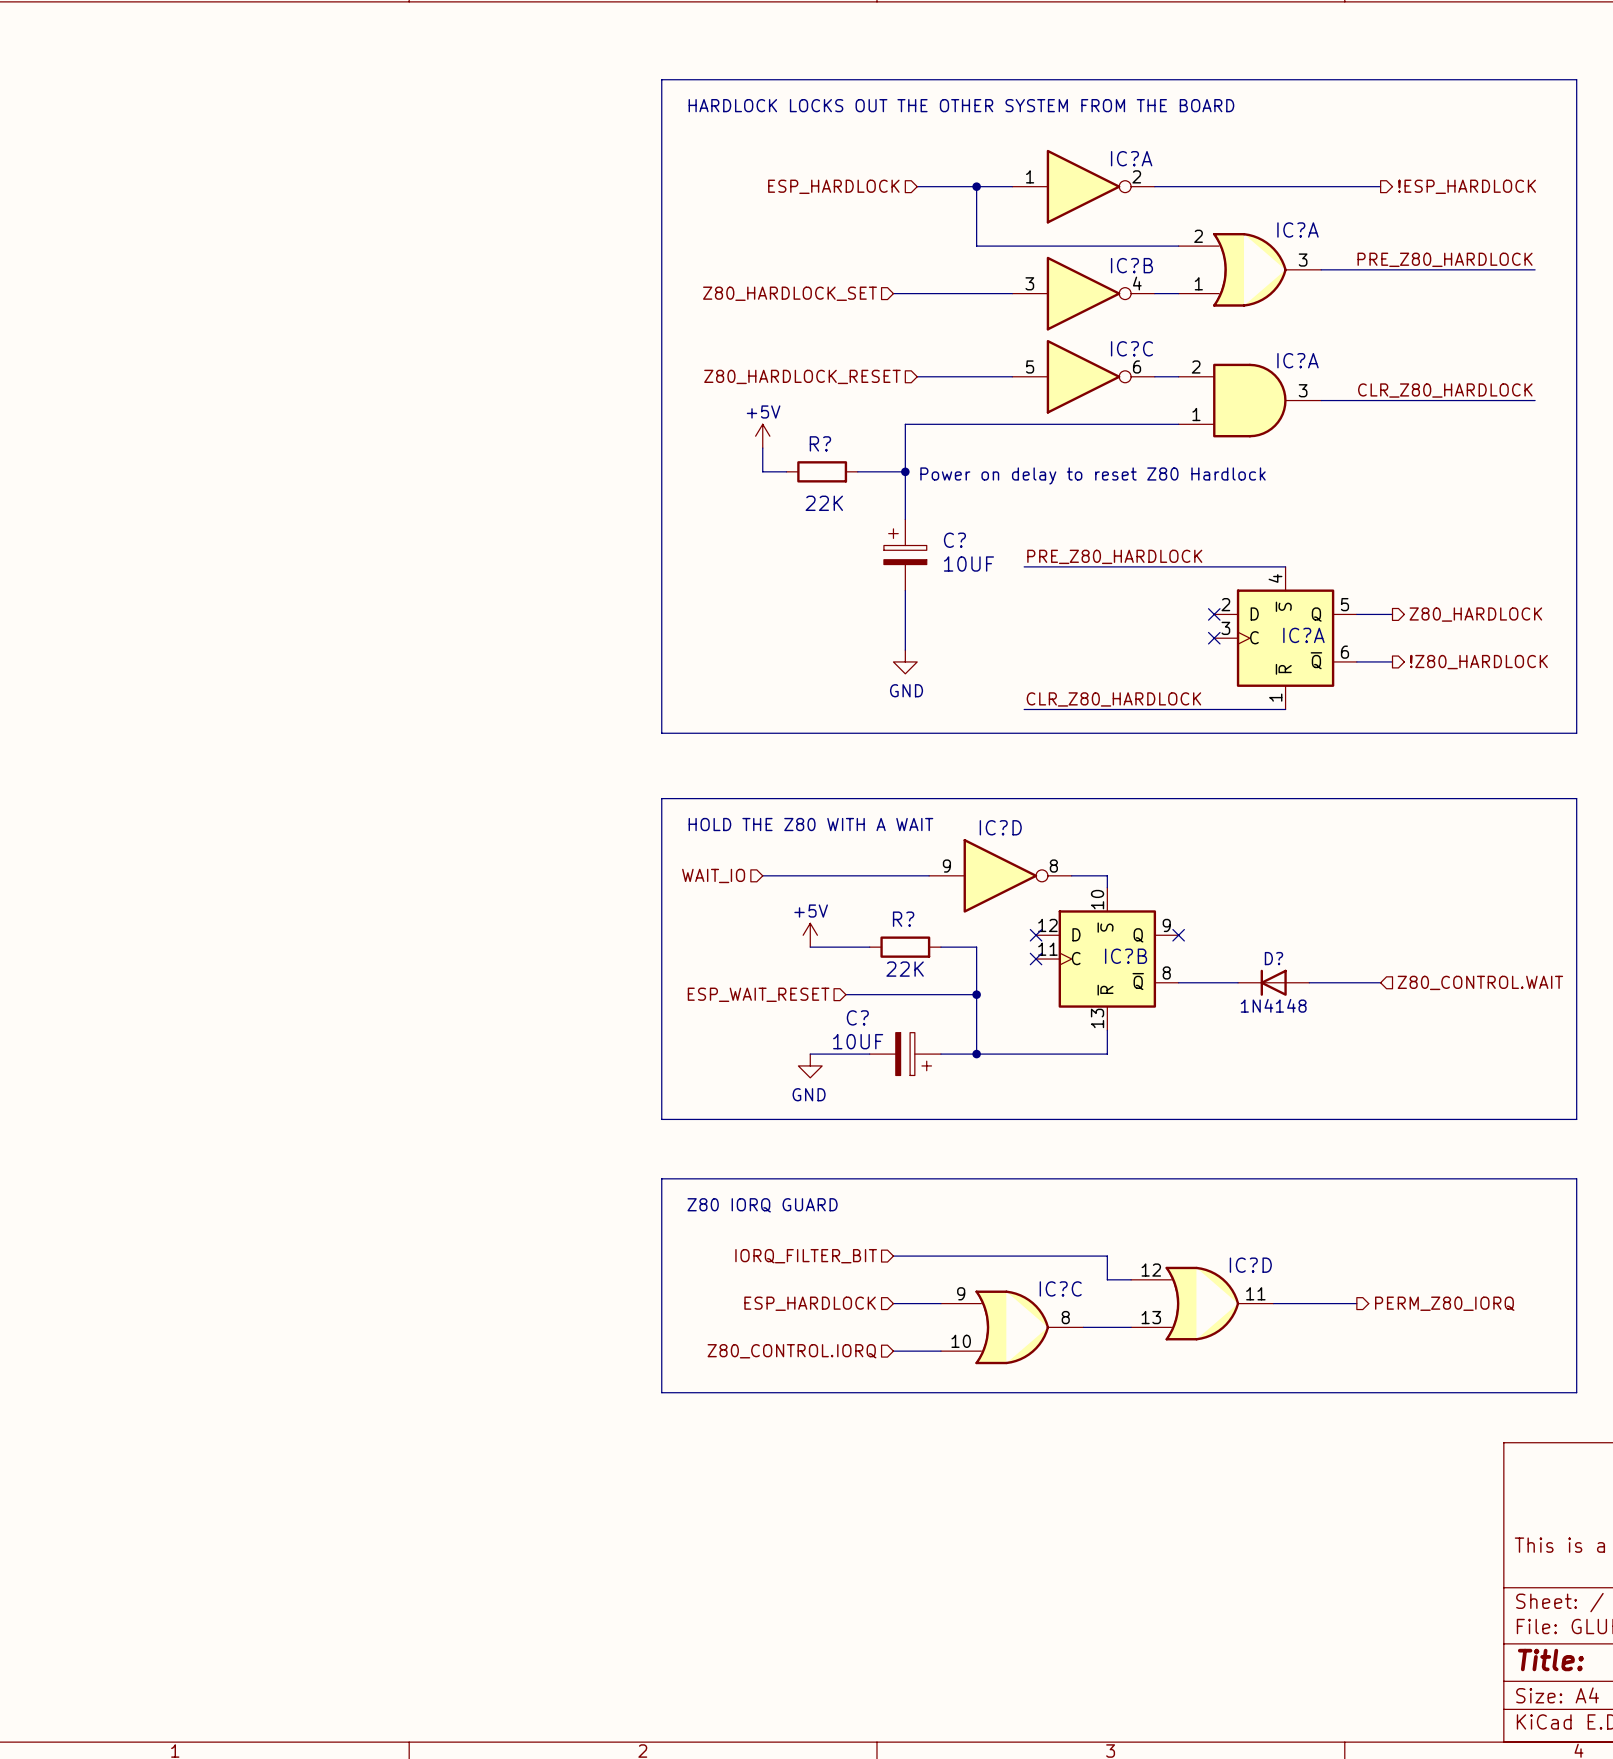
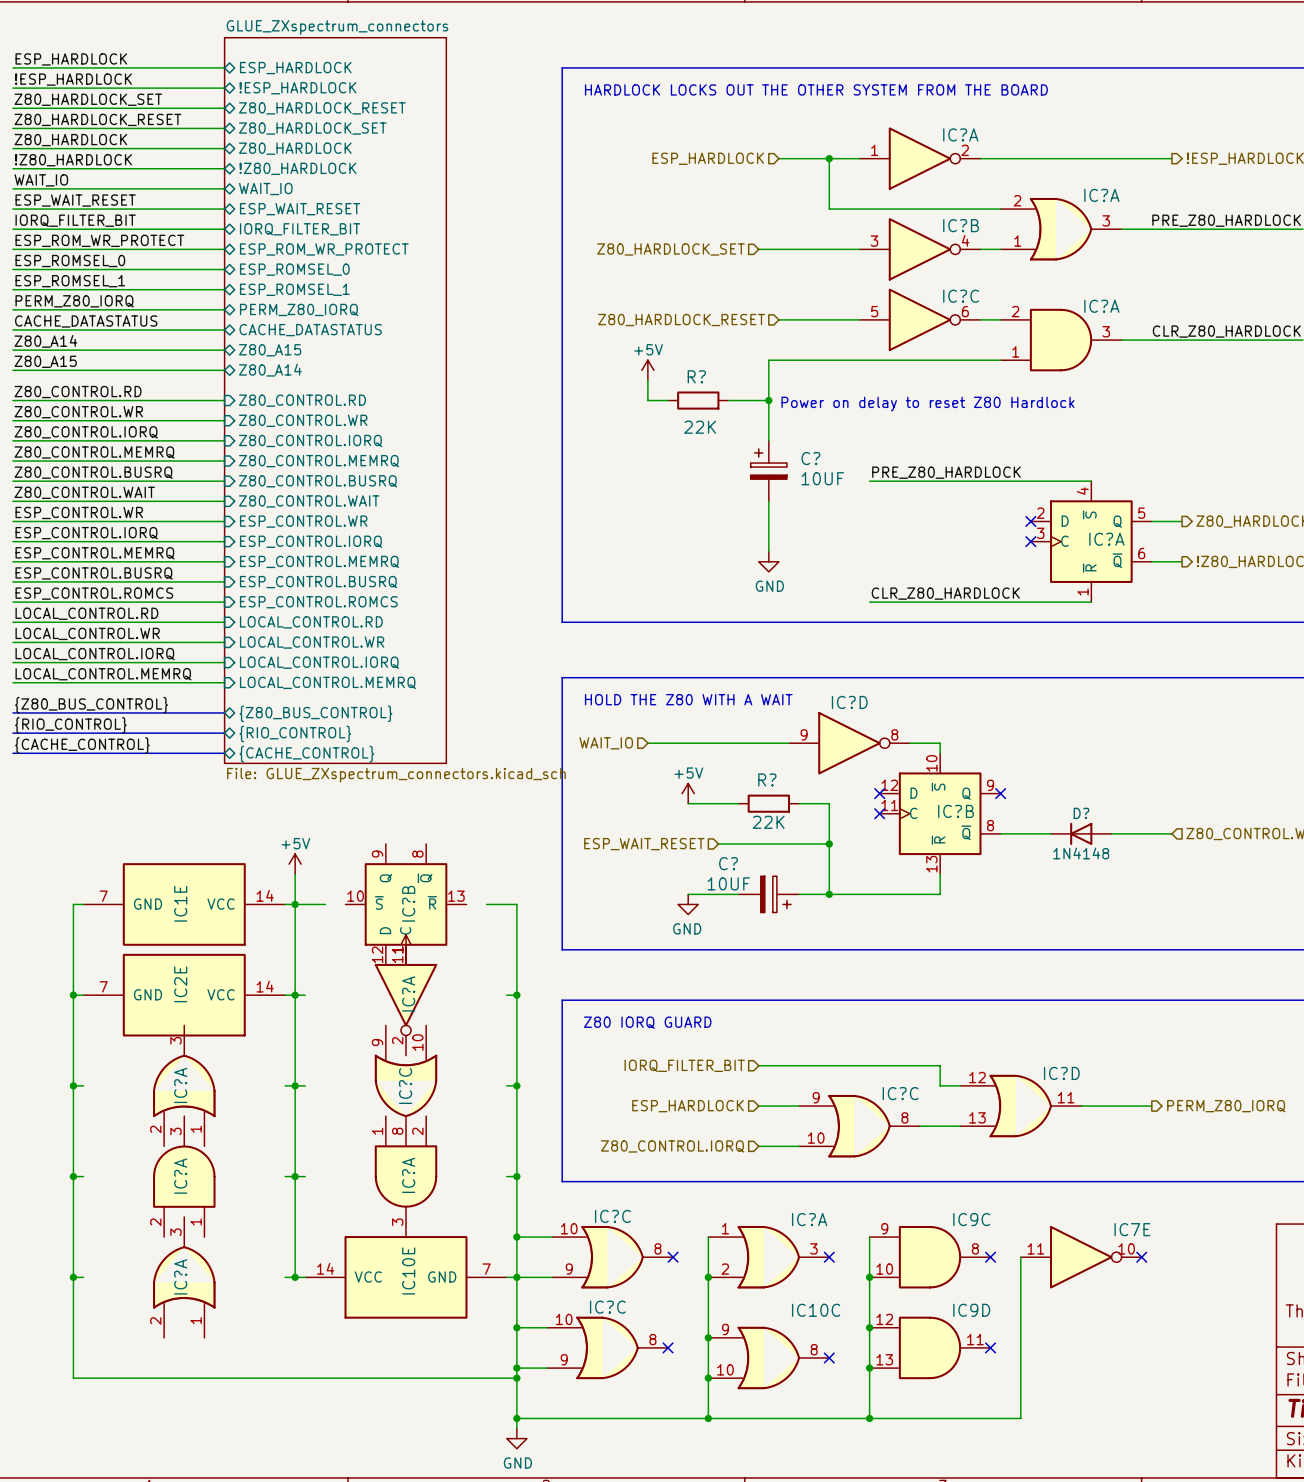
label: none -> ESP_HARDLOCK (71, 59)
wire: none -> (12, 67) (224, 67)
sheet pin: none -> ESP_HARDLOCK (295, 68)
label: none -> !ESP_HARDLOCK (73, 79)
wire: none -> (12, 88) (224, 88)
sheet pin: none -> !ESP_HARDLOCK (297, 88)
label: none -> Z80_HARDLOCK_SET (88, 99)
wire: none -> (12, 108) (224, 108)
sheet pin: none -> Z80_HARDLOCK_RESET (322, 108)
label: none -> Z80_HARDLOCK_RESET (97, 119)
wire: none -> (12, 128) (224, 128)
sheet pin: none -> Z80_HARDLOCK_SET (312, 128)
label: none -> Z80_HARDLOCK (70, 140)
wire: none -> (12, 148) (224, 148)
sheet pin: none -> Z80_HARDLOCK (295, 148)
label: none -> !Z80_HARDLOCK (73, 160)
wire: none -> (12, 168) (224, 168)
sheet pin: none -> !Z80_HARDLOCK (297, 168)
label: none -> WAIT_IO (41, 180)
wire: none -> (12, 188) (224, 188)
sheet pin: none -> WAIT_IO (265, 189)
label: none -> ESP_WAIT_RESET (75, 200)
wire: none -> (12, 209) (224, 209)
sheet pin: none -> ESP_WAIT_RESET (300, 209)
label: none -> IORQ_FILTER_BIT (75, 220)
wire: none -> (12, 229) (224, 229)
sheet pin: none -> IORQ_FILTER_BIT (300, 229)
label: none -> ESP_ROM_WR_PROTECT (99, 240)
wire: none -> (12, 249) (224, 249)
sheet pin: none -> ESP_ROM_WR_PROTECT (324, 249)
label: none -> ESP_ROMSEL_0 (70, 261)
wire: none -> (12, 269) (224, 269)
sheet pin: none -> ESP_ROMSEL_0 (294, 269)
label: none -> ESP_ROMSEL_1 (70, 281)
wire: none -> (12, 289) (224, 289)
sheet pin: none -> ESP_ROMSEL_1 (294, 289)
label: none -> PERM_Z80_IORQ (74, 301)
wire: none -> (12, 309) (224, 309)
sheet pin: none -> PERM_Z80_IORQ (299, 309)
label: none -> CACHE_DATASTATUS (86, 321)
wire: none -> (12, 329) (224, 329)
sheet pin: none -> CACHE_DATASTATUS (310, 330)
label: none -> Z80_A14 (45, 341)
wire: none -> (12, 350) (224, 350)
sheet pin: none -> Z80_A15 (270, 350)
label: none -> Z80_A15 (45, 361)
wire: none -> (12, 370) (224, 370)
sheet pin: none -> Z80_A14 (270, 370)
label: none -> Z80_CONTROL.RD (78, 392)
wire: none -> (12, 400) (224, 400)
sheet pin: none -> Z80_CONTROL.RD (302, 400)
sheet GLUE_ZXspectrum_connectors: none -> File: GLUE_ZXspectrum_connectors.kicad_sch (335, 400)
label: none -> Z80_CONTROL.WR (78, 412)
wire: none -> (12, 420) (224, 420)
sheet pin: none -> Z80_CONTROL.WR (303, 420)
label: none -> Z80_CONTROL.IORQ (86, 432)
wire: none -> (12, 440) (224, 440)
sheet pin: none -> Z80_CONTROL.IORQ (310, 440)
label: none -> Z80_CONTROL.MEMRQ (94, 452)
wire: none -> (12, 461) (224, 461)
sheet pin: none -> Z80_CONTROL.MEMRQ (319, 461)
label: none -> Z80_CONTROL.BUSRQ (93, 472)
wire: none -> (12, 481) (224, 481)
sheet pin: none -> Z80_CONTROL.BUSRQ (318, 481)
label: none -> Z80_CONTROL.WAIT (84, 492)
wire: none -> (12, 501) (224, 501)
sheet pin: none -> Z80_CONTROL.WAIT (309, 501)
label: none -> ESP_CONTROL.WR (79, 512)
wire: none -> (12, 521) (224, 521)
sheet pin: none -> ESP_CONTROL.WR (303, 521)
label: none -> ESP_CONTROL.IORQ (86, 533)
wire: none -> (12, 541) (224, 541)
sheet pin: none -> ESP_CONTROL.IORQ (311, 541)
label: none -> ESP_CONTROL.MEMRQ (95, 553)
wire: none -> (12, 561) (224, 561)
sheet pin: none -> ESP_CONTROL.MEMRQ (319, 561)
label: none -> ESP_CONTROL.BUSRQ (94, 573)
wire: none -> (12, 581) (224, 581)
sheet pin: none -> ESP_CONTROL.BUSRQ (318, 582)
label: none -> ESP_CONTROL.ROMCS (94, 593)
wire: none -> (12, 602) (224, 602)
sheet pin: none -> ESP_CONTROL.ROMCS (318, 602)
label: none -> LOCAL_CONTROL.RD (86, 613)
wire: none -> (12, 622) (224, 622)
sheet pin: none -> LOCAL_CONTROL.RD (311, 622)
label: none -> LOCAL_CONTROL.WR (87, 633)
wire: none -> (12, 642) (224, 642)
sheet pin: none -> LOCAL_CONTROL.WR (312, 642)
label: none -> LOCAL_CONTROL.IORQ (95, 654)
wire: none -> (12, 662) (224, 662)
sheet pin: none -> LOCAL_CONTROL.IORQ (319, 662)
label: none -> LOCAL_CONTROL.MEMRQ (103, 674)
wire: none -> (12, 682) (224, 682)
sheet pin: none -> LOCAL_CONTROL.MEMRQ (327, 682)
label: none -> {Z80_BUS_CONTROL} (91, 705)
bus: none -> (12, 712) (224, 712)
sheet pin: none -> {Z80_BUS_CONTROL} (315, 713)
label: none -> {RIO_CONTROL} (70, 725)
bus: none -> (12, 733) (224, 733)
sheet pin: none -> {RIO_CONTROL} (295, 733)
label: none -> {CACHE_CONTROL} (82, 745)
bus: none -> (12, 753) (224, 753)
sheet pin: none -> {CACHE_CONTROL} (306, 754)
power symbol: none -> +5V (295, 864)
wire: none -> (295, 874) (295, 1277)
wire: none -> (83, 904) (73, 904) (73, 1378) (516, 1378)
IC1E: none -> (184, 904)
wire: none -> (285, 904) (325, 904)
junction: none -> (295, 904)
IC?B: none -> (406, 904)
wire: none -> (486, 904) (516, 904) (516, 1428)
wire: none -> (73, 995) (83, 995)
junction: none -> (73, 995)
IC2E: none -> (184, 995)
wire: none -> (285, 995) (305, 995)
junction: none -> (295, 995)
IC?A: none -> (406, 995)
wire: none -> (506, 995) (516, 995)
junction: none -> (516, 995)
wire: none -> (73, 1085) (83, 1085)
junction: none -> (73, 1085)
IC?A: none -> (184, 1085)
wire: none -> (285, 1085) (305, 1085)
junction: none -> (295, 1085)
IC?C: none -> (406, 1085)
wire: none -> (506, 1085) (516, 1085)
junction: none -> (516, 1085)
wire: none -> (73, 1176) (83, 1176)
junction: none -> (73, 1176)
IC?A: none -> (184, 1176)
wire: none -> (285, 1176) (305, 1176)
junction: none -> (295, 1176)
IC?A: none -> (406, 1176)
wire: none -> (506, 1176) (516, 1176)
junction: none -> (516, 1176)
wire: none -> (516, 1237) (552, 1237)
junction: none -> (516, 1237)
wire: none -> (708, 1237) (708, 1418)
wire: none -> (869, 1237) (869, 1418)
IC?C: none -> (612, 1257)
no-connect mark: none -> (673, 1257)
IC?A: none -> (768, 1257)
no-connect mark: none -> (829, 1257)
IC9C: none -> (930, 1257)
no-connect mark: none -> (990, 1257)
wire: none -> (1020, 1257) (1020, 1418) (516, 1418)
IC7E: none -> (1081, 1257)
no-connect mark: none -> (1141, 1257)
wire: none -> (73, 1277) (83, 1277)
junction: none -> (73, 1277)
IC?A: none -> (184, 1277)
wire: none -> (285, 1277) (305, 1277)
junction: none -> (295, 1277)
IC10E: none -> (406, 1277)
wire: none -> (506, 1277) (552, 1277)
junction: none -> (516, 1277)
junction: none -> (708, 1277)
junction: none -> (869, 1277)
wire: none -> (516, 1327) (547, 1327)
junction: none -> (516, 1327)
junction: none -> (869, 1327)
junction: none -> (708, 1337)
IC?C: none -> (607, 1347)
no-connect mark: none -> (668, 1347)
IC9D: none -> (930, 1347)
no-connect mark: none -> (990, 1347)
IC10C: none -> (768, 1358)
no-connect mark: none -> (829, 1358)
wire: none -> (516, 1368) (547, 1368)
junction: none -> (516, 1368)
junction: none -> (869, 1368)
junction: none -> (516, 1378)
junction: none -> (708, 1378)
junction: none -> (516, 1418)
junction: none -> (708, 1418)
junction: none -> (869, 1418)
power symbol: none -> GND (516, 1438)

